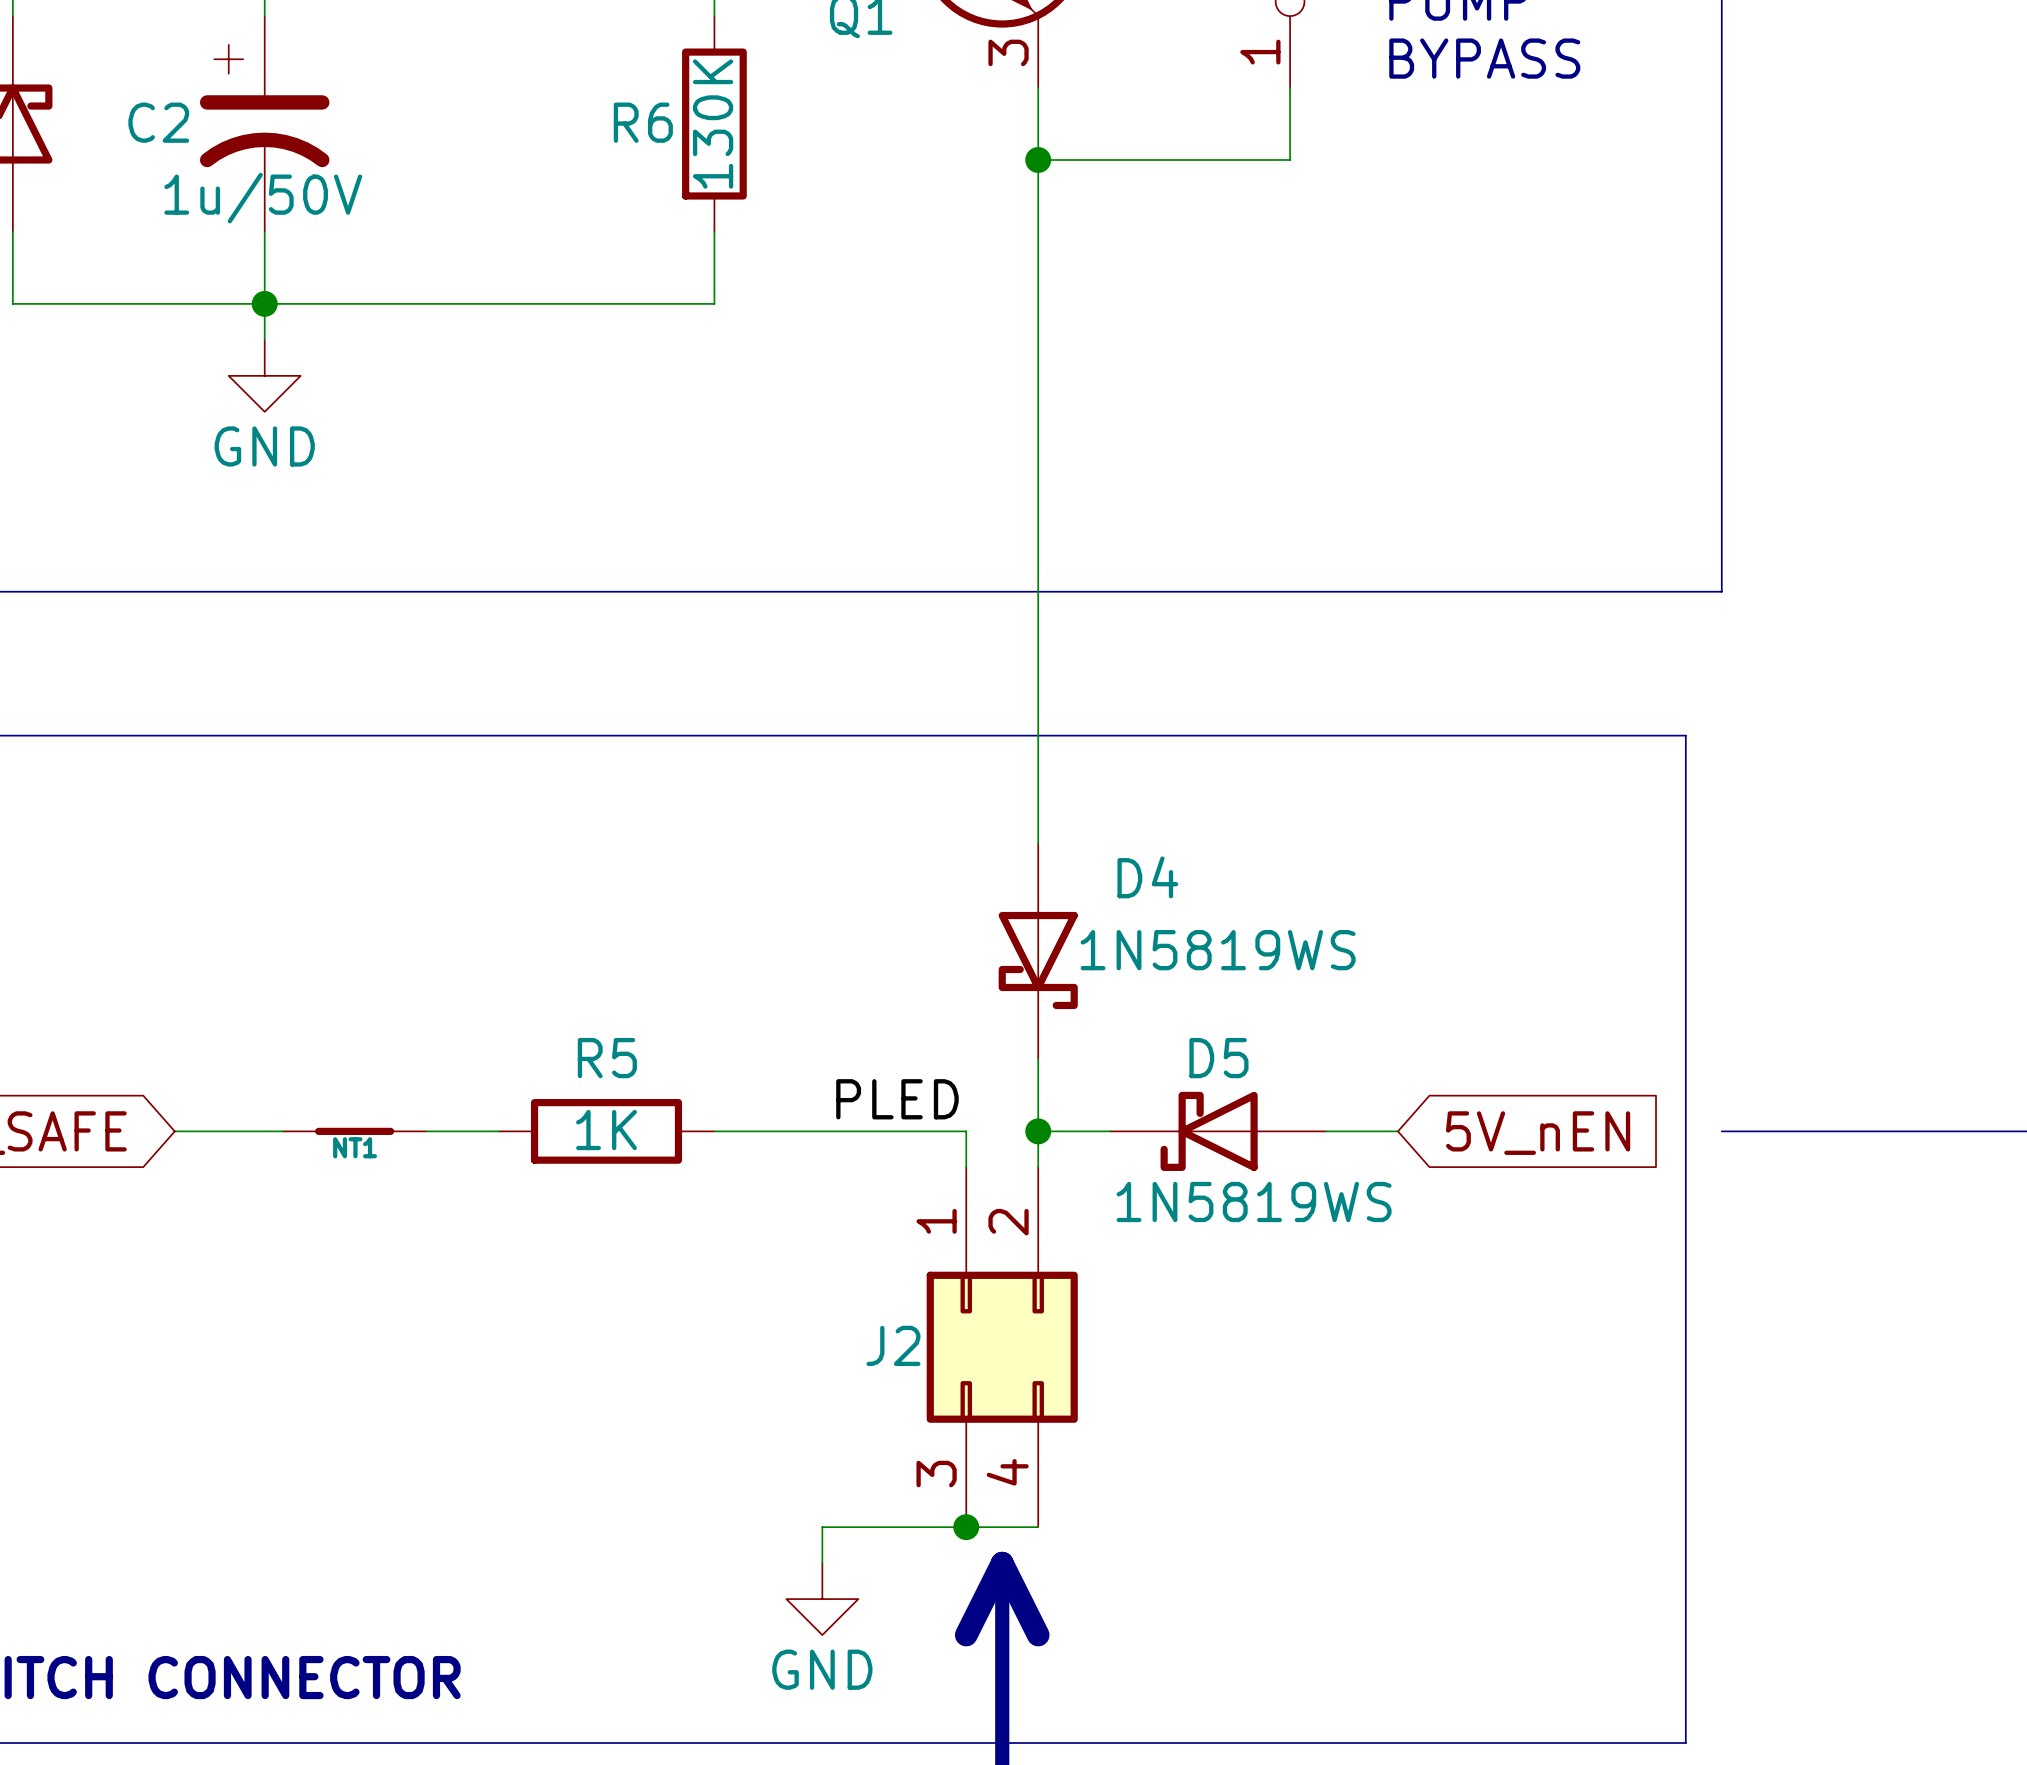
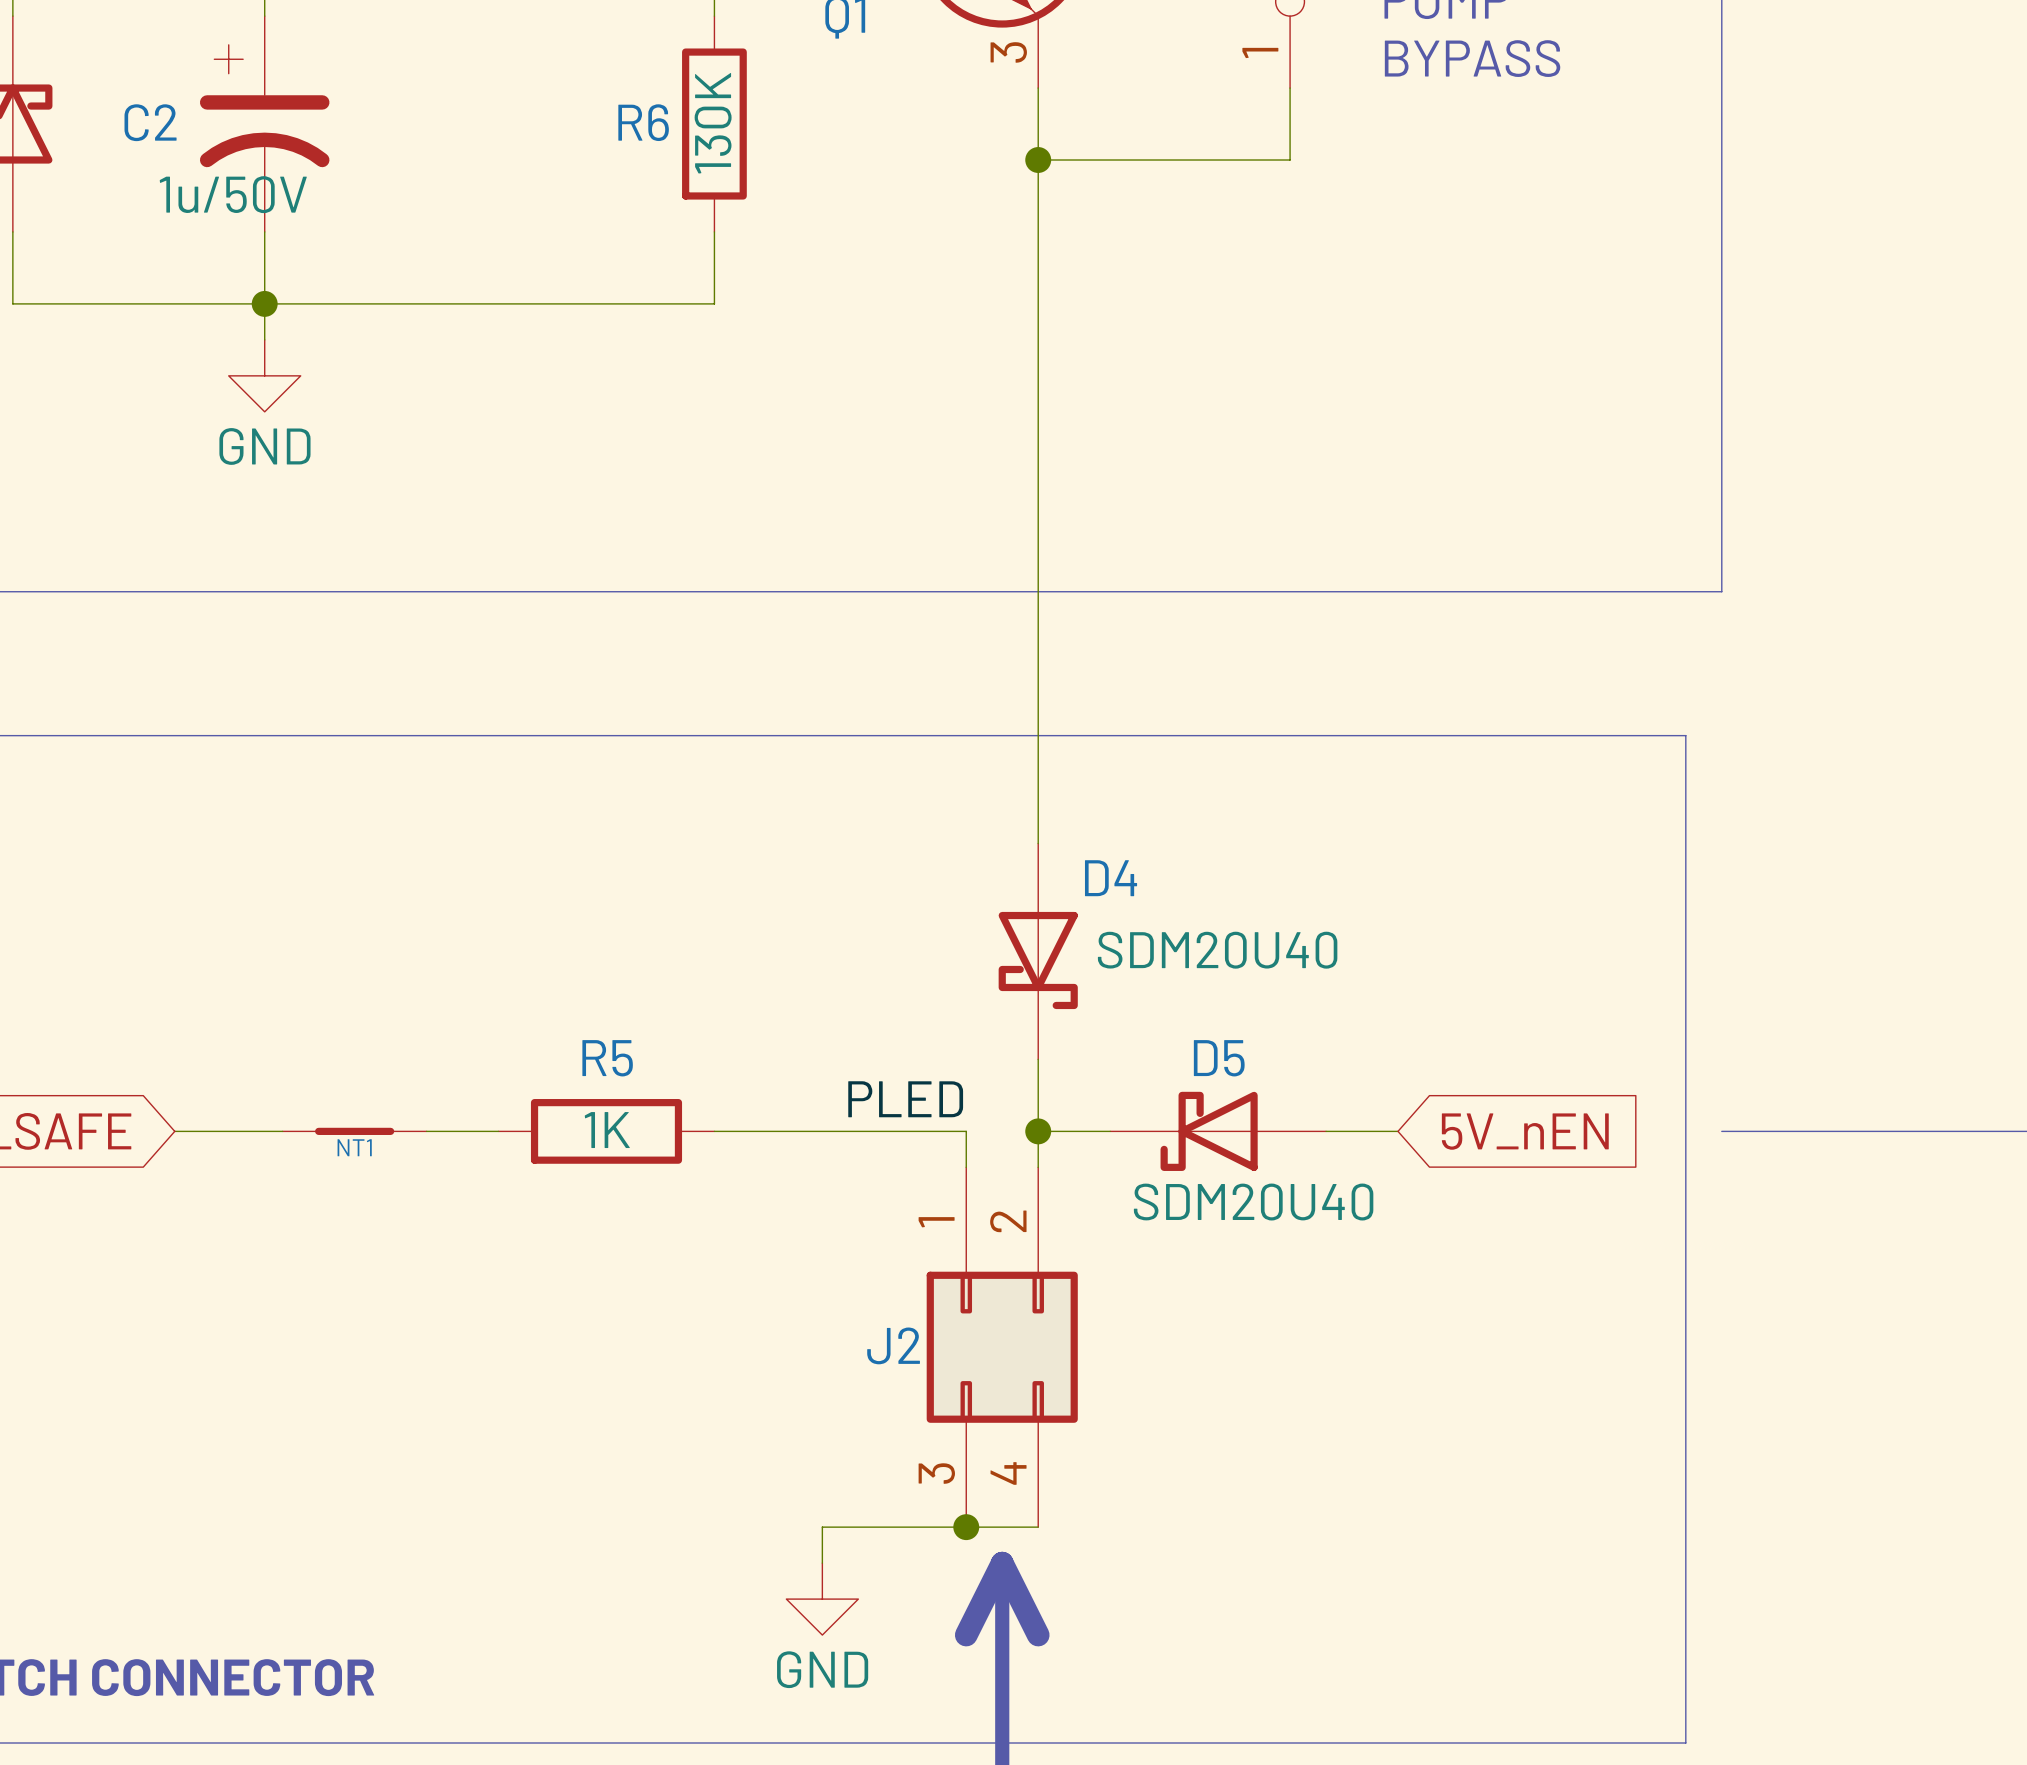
D4 name position: D4 (1147, 877) -> D4 (1111, 878)
D4 value: 1N5819WS (1218, 950) -> SDM20U40 (1217, 950)
D5 value: 1N5819WS (1254, 1202) -> SDM20U40 (1253, 1202)

